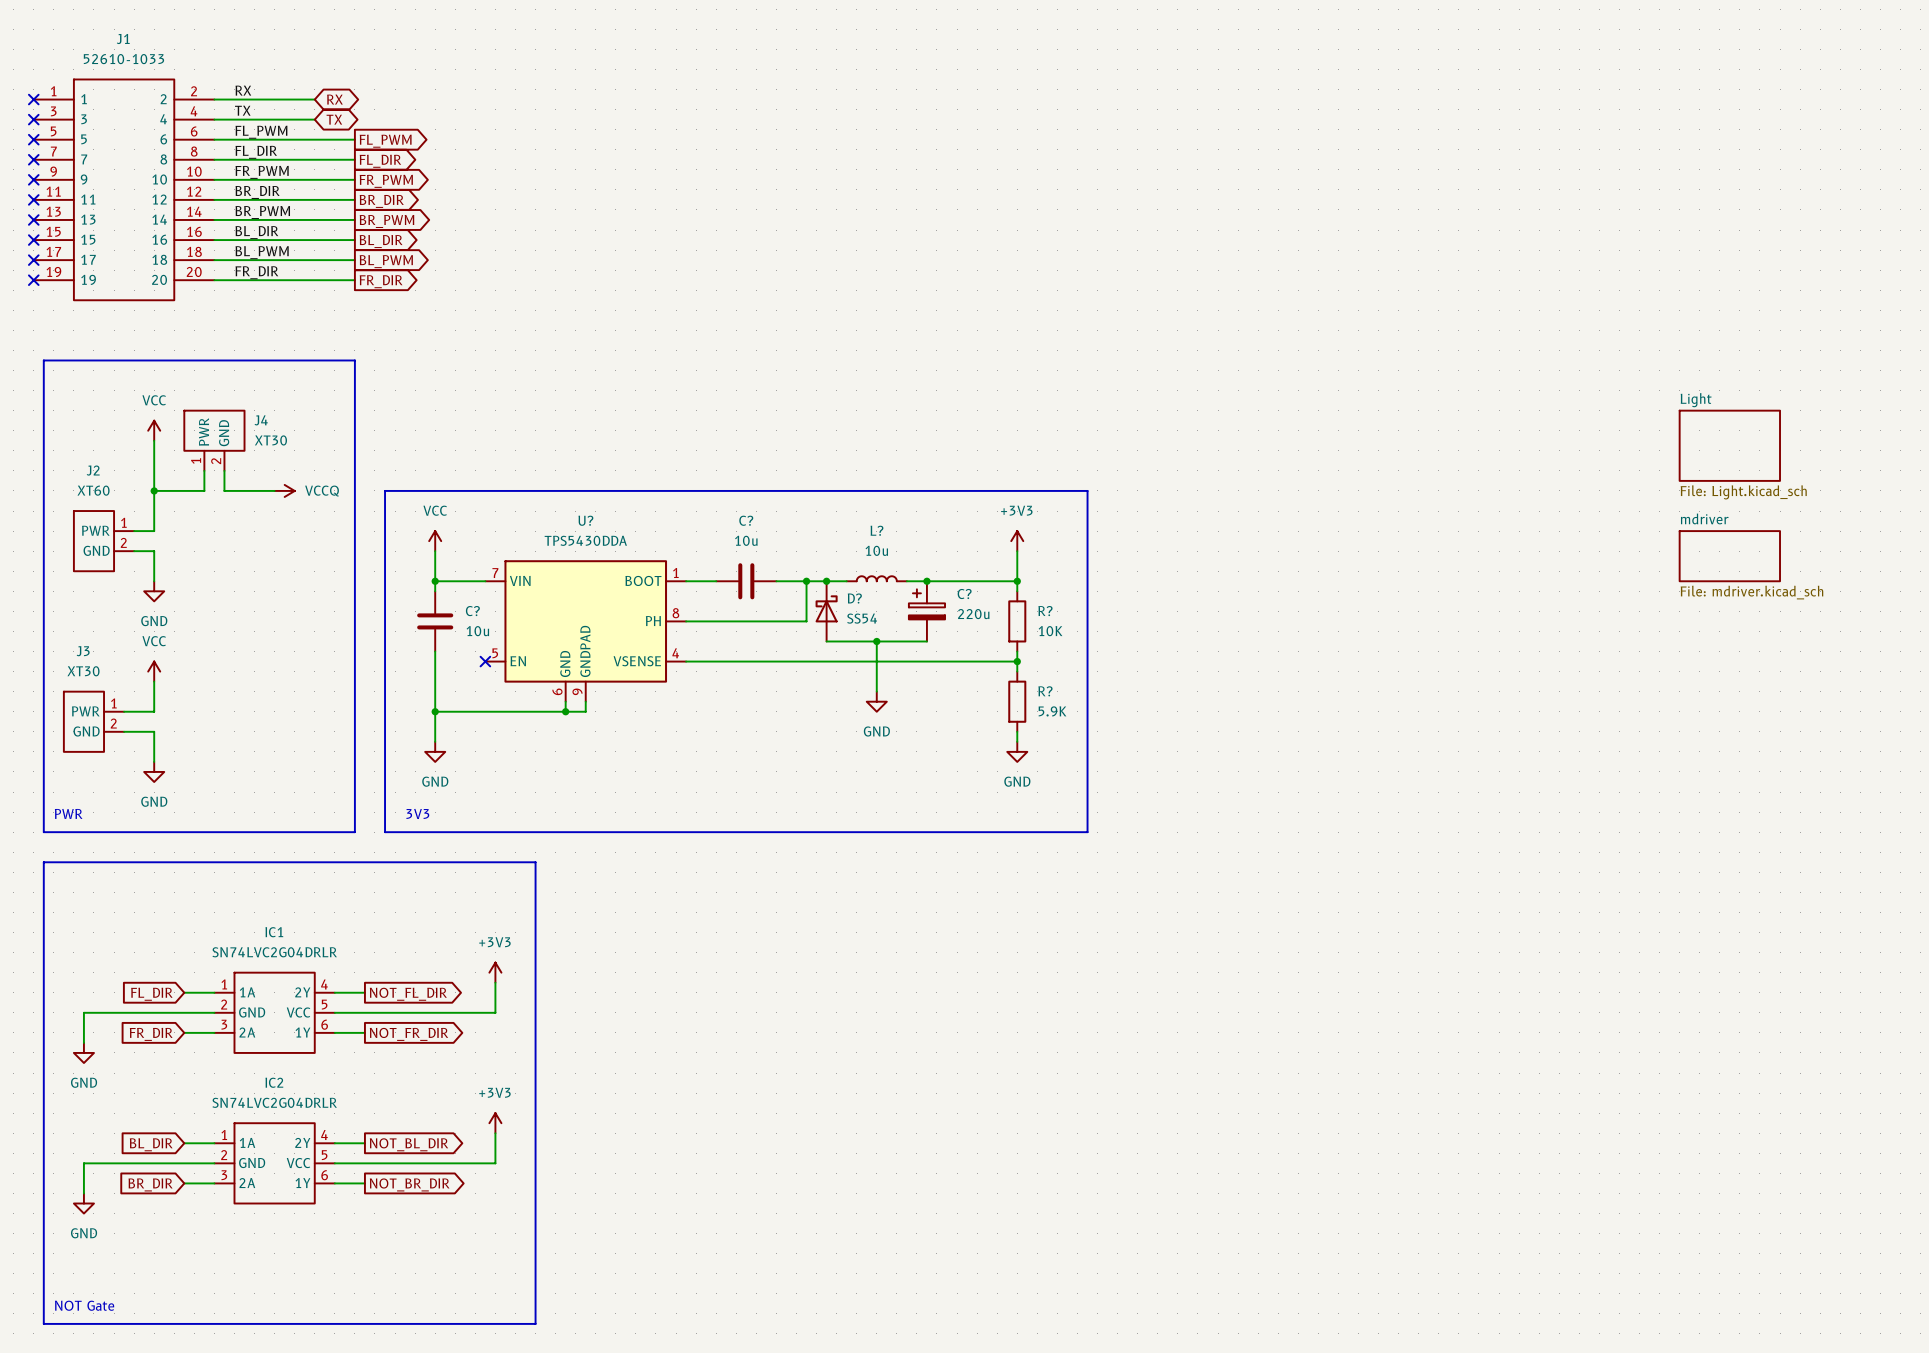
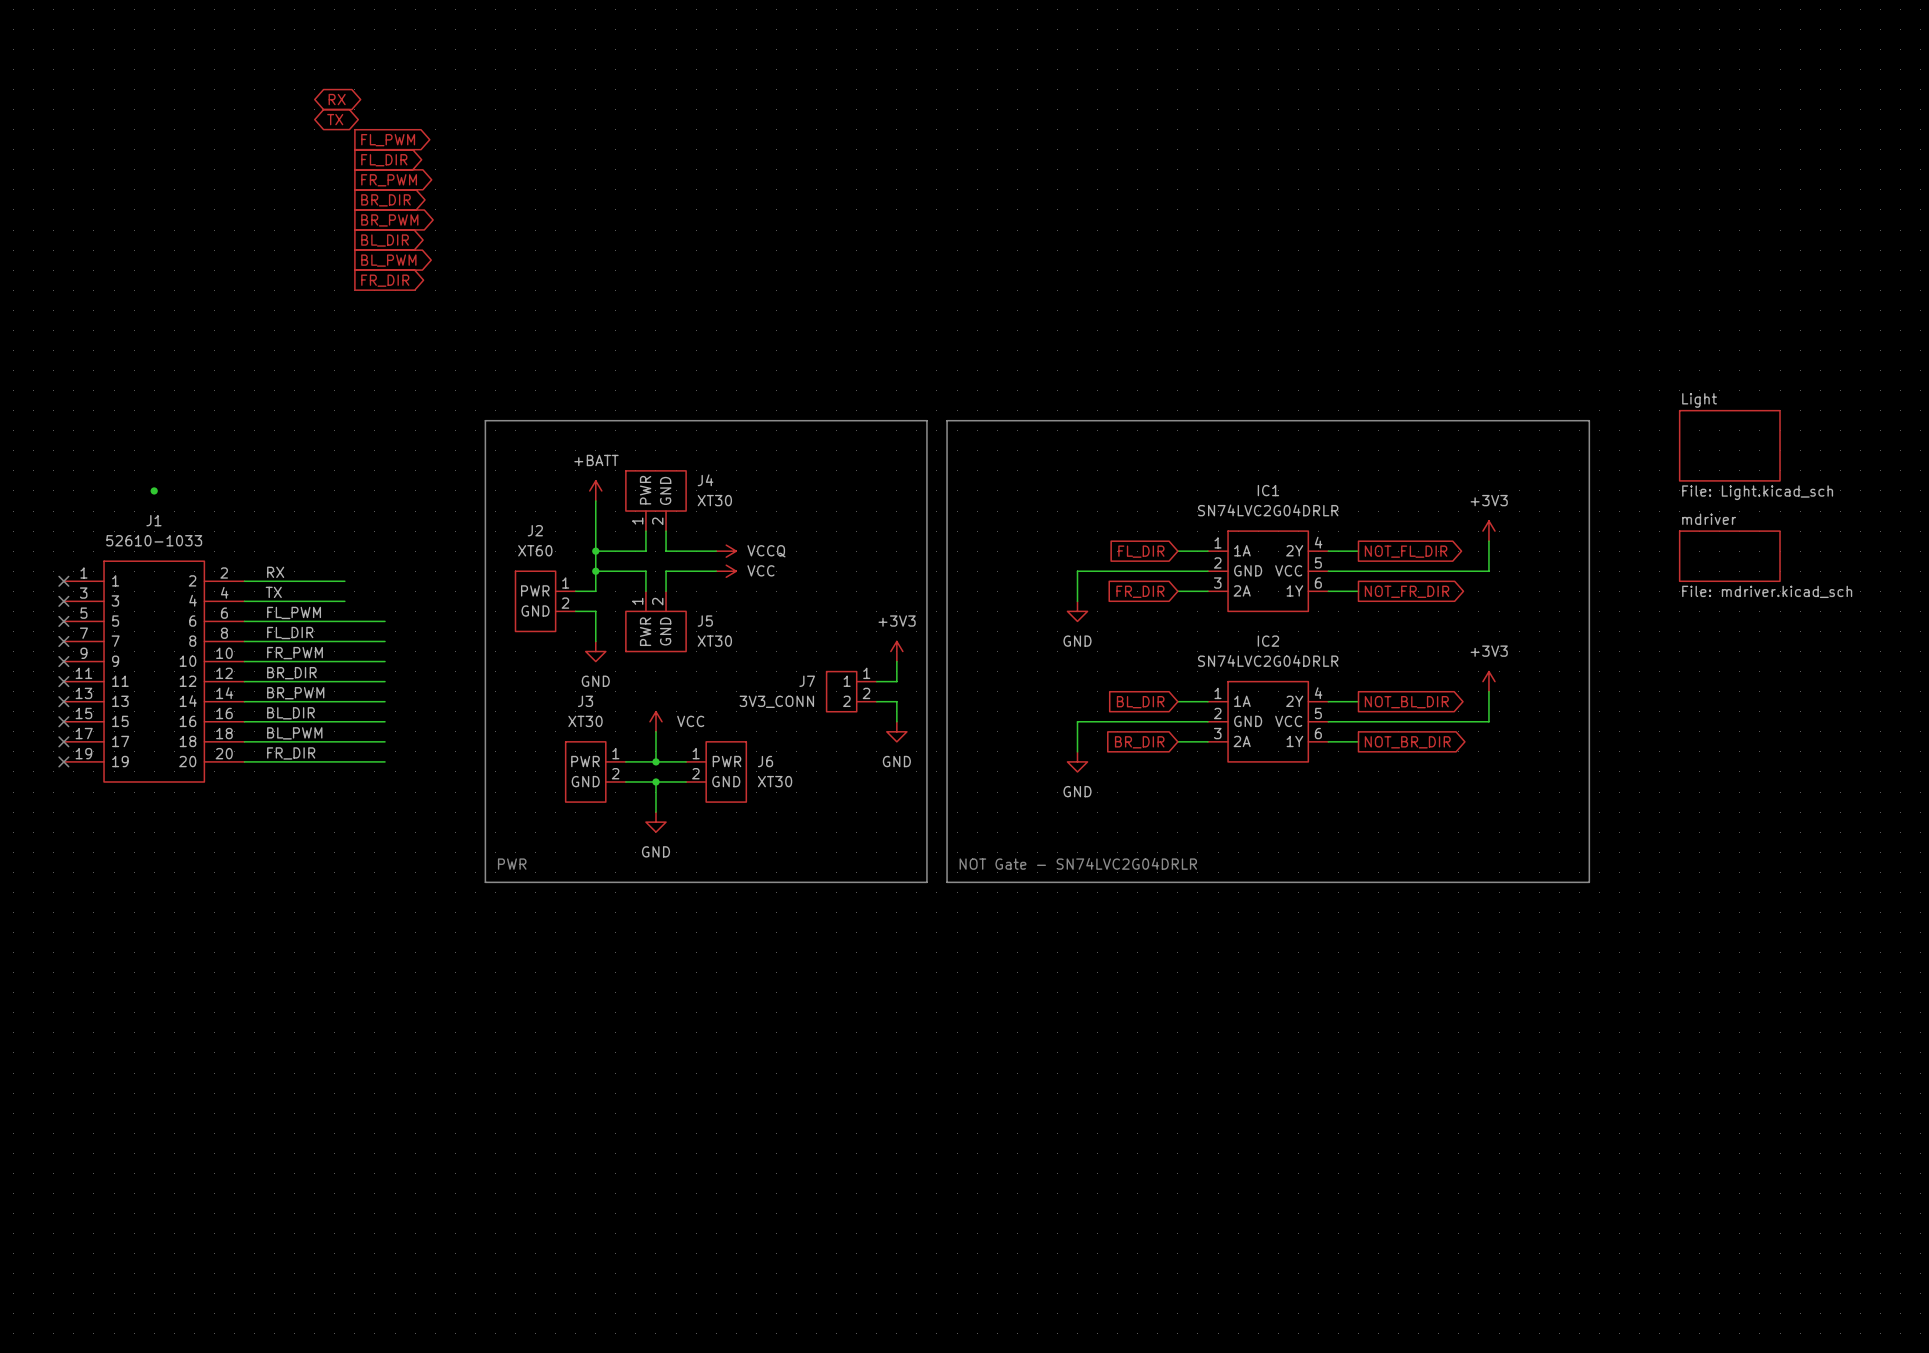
label: RX (243, 90) -> none
no-connect mark: (33, 99) -> none
wire: (214, 99) (314, 99) -> none
label: TX (242, 110) -> none
no-connect mark: (33, 119) -> none
wire: (214, 119) (314, 119) -> none
label: FL_PWM (261, 132) -> none
no-connect mark: (33, 139) -> none
wire: (214, 139) (354, 139) -> none
label: FL_DIR (256, 152) -> none
no-connect mark: (33, 159) -> none
wire: (214, 159) (354, 159) -> none
label: FR_PWM (262, 172) -> none
no-connect mark: (33, 179) -> none
wire: (214, 179) (354, 179) -> none
J1 position: (124, 189) -> (154, 671)
label: BR_DIR (257, 192) -> none
no-connect mark: (33, 199) -> none
wire: (214, 199) (354, 199) -> none
label: BR_PWM (262, 212) -> none
no-connect mark: (33, 219) -> none
wire: (214, 219) (354, 219) -> none
label: BL_DIR (256, 232) -> none
no-connect mark: (33, 240) -> none
wire: (214, 240) (354, 240) -> none
label: BL_PWM (262, 252) -> none
no-connect mark: (33, 260) -> none
wire: (214, 260) (354, 260) -> none
label: FR_DIR (256, 272) -> none
no-connect mark: (33, 280) -> none
wire: (214, 280) (354, 280) -> none
line: (43, 360) (354, 360) (354, 832) (43, 832) (43, 360) -> none
line: none -> (947, 420) (1589, 420) (1589, 882) (947, 882) (947, 420)
power symbol: VCC (154, 430) -> none
wire: (154, 440) (154, 531) (134, 531) -> none
J4 position: (214, 440) -> (655, 500)
wire: (204, 470) (204, 490) (154, 490) -> none
wire: (224, 470) (224, 490) (274, 490) -> none
power symbol: VCCQ (284, 490) -> none
line: (385, 490) (1087, 490) (1087, 832) (385, 832) (385, 490) -> (485, 420) (485, 882) (926, 882) (926, 420) (485, 420)
power symbol: none -> +BATT (595, 490)
wire: none -> (595, 500) (595, 591) (575, 591)
wire: none -> (645, 531) (645, 551) (595, 551)
wire: none -> (666, 531) (666, 551) (716, 551)
power symbol: none -> +3V3 (1488, 531)
J2 position: (104, 541) -> (545, 601)
power symbol: VCC (435, 541) -> none
power symbol position: +3V3 (1017, 541) -> +3V3 (896, 651)
wire: none -> (1488, 541) (1488, 571) (1328, 571)
wire: (134, 551) (154, 551) (154, 581) -> none
wire: (435, 551) (435, 591) -> none
junction: none -> (595, 551)
power symbol: none -> VCCQ (726, 551)
wire: (1017, 551) (1017, 591) -> none
wire: none -> (1177, 551) (1207, 551)
wire: none -> (1328, 551) (1358, 551)
global label: none -> FL_DIR (1141, 551)
global label: none -> NOT_FL_DIR (1406, 551)
junction: none -> (595, 571)
wire: none -> (716, 571) (666, 571) (666, 591)
power symbol: none -> VCC (726, 571)
wire: none -> (1207, 571) (1077, 571) (1077, 601)
label: none -> RX (275, 572)
L?: 10u (876, 578) -> none
no-connect mark: none -> (63, 581)
wire: none -> (244, 581) (344, 581)
wire: (435, 581) (485, 581) -> none
junction: (435, 581) -> none
wire: (686, 581) (716, 581) -> none
C?: 10u (746, 581) -> none
wire: (776, 581) (846, 581) -> none
wire: (806, 581) (806, 621) (686, 621) -> none
junction: (806, 581) -> none
junction: (826, 581) -> none
wire: (906, 581) (1017, 581) -> none
junction: (926, 581) -> none
junction: (1017, 581) -> none
power symbol: GND (154, 591) -> none
wire: none -> (1177, 591) (1207, 591)
wire: none -> (1328, 591) (1358, 591)
label: none -> TX (273, 592)
global label: none -> FR_DIR (1140, 591)
global label: none -> NOT_FR_DIR (1407, 591)
no-connect mark: none -> (63, 601)
wire: none -> (244, 601) (344, 601)
D?: SS54 (826, 611) -> none
C?: 220u (926, 611) -> none
power symbol: none -> GND (1077, 611)
label: none -> FL_PWM (294, 612)
no-connect mark: none -> (63, 621)
wire: none -> (244, 621) (385, 621)
C?: 10u (435, 621) -> none
J5: none -> XT30 (655, 621)
R?: 10K (1017, 621) -> none
U?: TPS5430DDA (585, 630) -> none
label: none -> FL_DIR (290, 633)
no-connect mark: none -> (63, 641)
wire: none -> (244, 641) (385, 641)
wire: (826, 641) (926, 641) -> none
wire: (876, 641) (876, 691) -> none
junction: (876, 641) -> none
wire: (435, 651) (435, 741) -> none
power symbol: none -> GND (595, 651)
wire: (1017, 651) (1017, 671) -> none
label: none -> FR_PWM (295, 653)
no-connect mark: none -> (63, 661)
wire: none -> (244, 661) (385, 661)
no-connect mark: (485, 661) -> none
wire: (686, 661) (1017, 661) -> none
wire: none -> (896, 661) (896, 681) (876, 681)
junction: (1017, 661) -> none
power symbol: VCC (154, 671) -> none
label: none -> BR_DIR (291, 673)
no-connect mark: none -> (63, 681)
wire: (154, 681) (154, 711) (124, 711) -> none
wire: none -> (244, 681) (385, 681)
power symbol: none -> +3V3 (1488, 681)
J7: none -> 3V3_CONN (851, 691)
wire: none -> (1488, 691) (1488, 721) (1328, 721)
label: none -> BR_PWM (295, 693)
no-connect mark: none -> (63, 701)
wire: none -> (244, 701) (385, 701)
wire: (565, 701) (565, 711) -> none
wire: (585, 701) (585, 711) (435, 711) -> none
wire: none -> (876, 701) (896, 701) (896, 721)
power symbol position: GND (876, 701) -> GND (896, 731)
R?: 5.9K (1017, 701) -> none
wire: none -> (1177, 701) (1207, 701)
wire: none -> (1328, 701) (1358, 701)
global label: none -> BL_DIR (1140, 702)
global label: none -> NOT_BL_DIR (1406, 702)
junction: (435, 711) -> none
junction: (565, 711) -> none
label: none -> BL_DIR (290, 713)
no-connect mark: none -> (63, 721)
J3 position: (93, 721) -> (595, 771)
wire: none -> (244, 721) (385, 721)
power symbol: none -> VCC (655, 721)
wire: none -> (1207, 721) (1077, 721) (1077, 751)
wire: (124, 731) (154, 731) (154, 761) -> none
wire: none -> (655, 731) (655, 761)
wire: (1017, 731) (1017, 741) -> none
label: none -> BL_PWM (294, 733)
no-connect mark: none -> (63, 741)
wire: none -> (244, 741) (385, 741)
wire: none -> (1177, 741) (1207, 741)
wire: none -> (1328, 741) (1358, 741)
global label: none -> BR_DIR (1139, 742)
global label: none -> NOT_BR_DIR (1407, 742)
power symbol: GND (435, 751) -> none
power symbol: GND (1017, 751) -> none
label: none -> FR_DIR (291, 753)
no-connect mark: none -> (63, 761)
wire: none -> (244, 761) (385, 761)
wire: none -> (625, 761) (686, 761)
junction: none -> (655, 761)
power symbol: none -> GND (1077, 761)
power symbol: GND (154, 771) -> none
J6: none -> XT30 (716, 771)
wire: none -> (625, 781) (686, 781)
wire: none -> (655, 781) (655, 812)
junction: none -> (655, 781)
text: PWR (68, 813) -> none
text: 3V3 (417, 813) -> none
power symbol: none -> GND (655, 822)
line: (43, 862) (43, 1323) (535, 1323) (535, 862) (43, 862) -> none
text: none -> PWR (512, 864)
text: none -> NOT Gate - SN74LVC2G04DRLR (1078, 863)
power symbol: +3V3 (495, 972) -> none
wire: (495, 982) (495, 1012) (334, 1012) -> none
wire: (184, 992) (214, 992) -> none
wire: (334, 992) (364, 992) -> none
global label: FL_DIR (151, 994) -> none
global label: NOT_FL_DIR (408, 994) -> none
wire: (214, 1012) (83, 1012) (83, 1042) -> none
IC1 position: (274, 1012) -> (1268, 571)
wire: (184, 1032) (214, 1032) -> none
wire: (334, 1032) (364, 1032) -> none
global label: FR_DIR (151, 1034) -> none
global label: NOT_FR_DIR (409, 1034) -> none
power symbol: GND (83, 1052) -> none
power symbol: +3V3 (495, 1123) -> none
wire: (495, 1133) (495, 1163) (334, 1163) -> none
wire: (184, 1143) (214, 1143) -> none
wire: (334, 1143) (364, 1143) -> none
global label: BL_DIR (151, 1144) -> none
global label: NOT_BL_DIR (409, 1144) -> none
wire: (214, 1163) (83, 1163) (83, 1193) -> none
IC2 position: (274, 1163) -> (1268, 721)
wire: (184, 1183) (214, 1183) -> none
wire: (334, 1183) (364, 1183) -> none
global label: BR_DIR (150, 1184) -> none
global label: NOT_BR_DIR (409, 1184) -> none
power symbol: GND (83, 1203) -> none
text: NOT Gate (84, 1305) -> none

